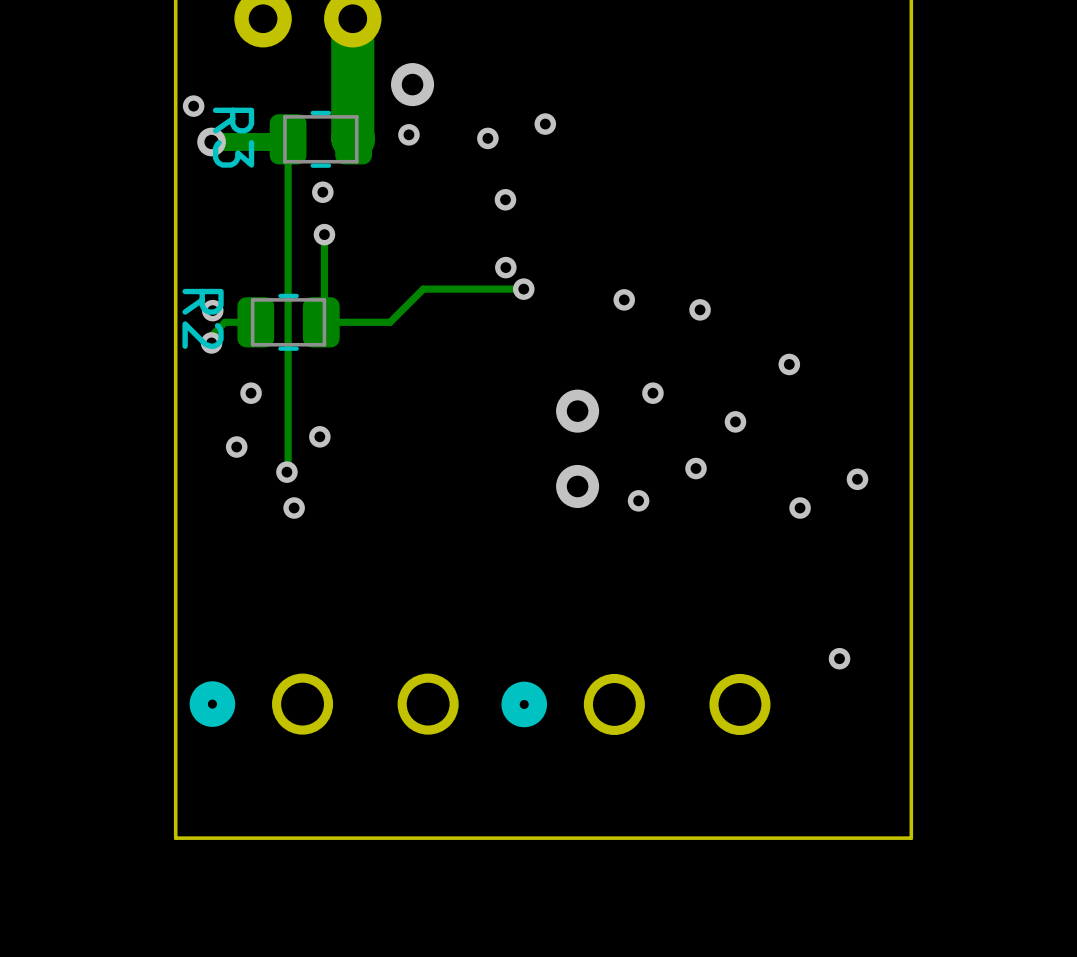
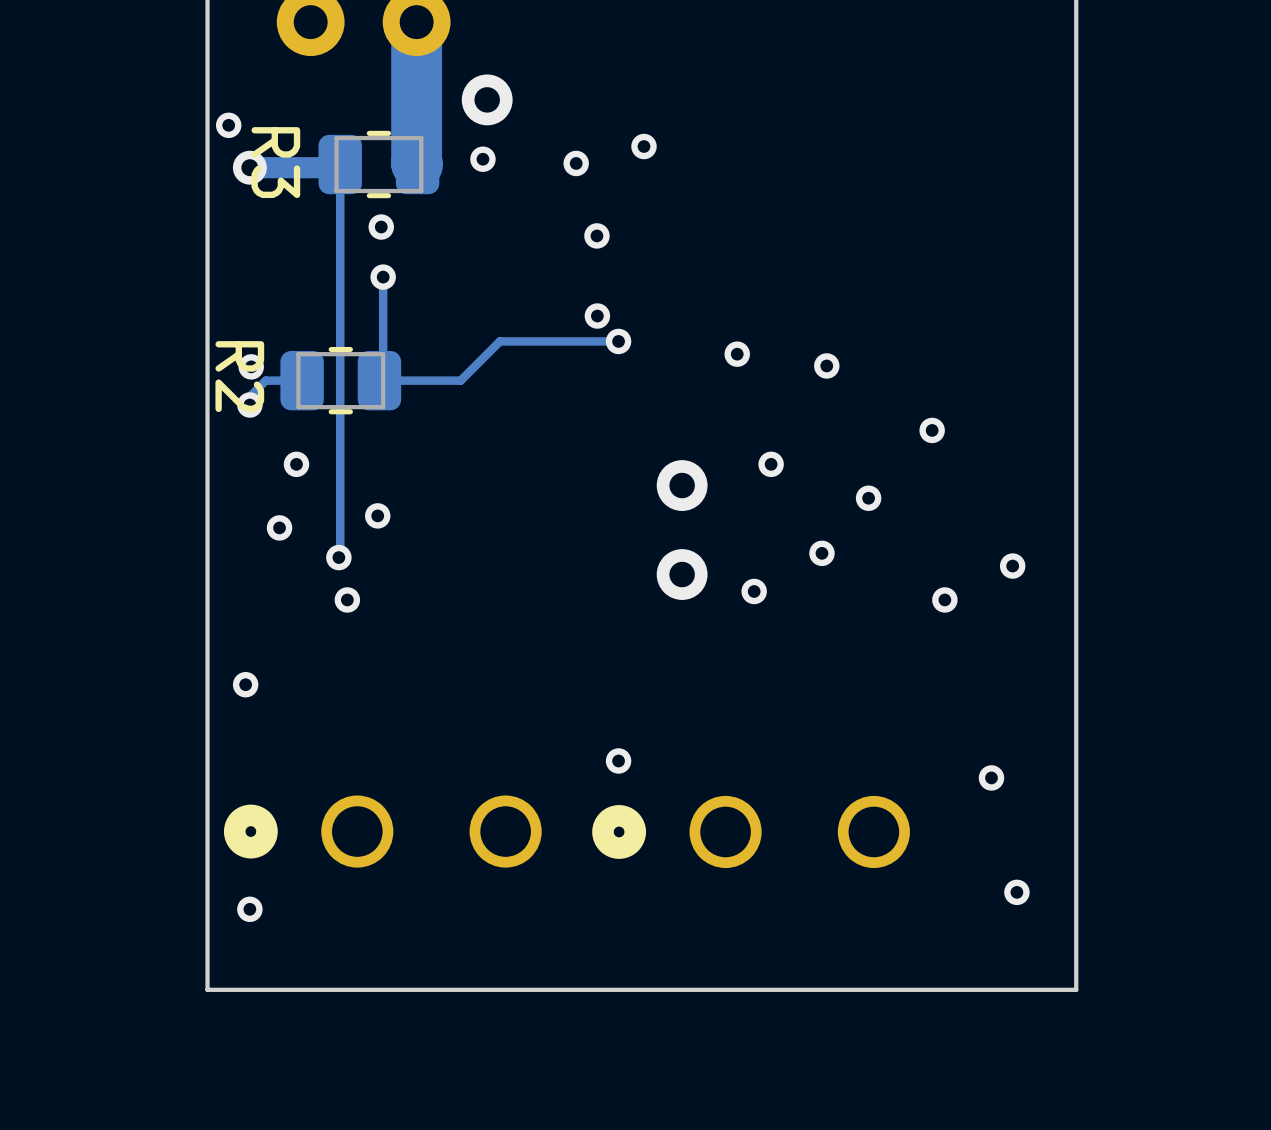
via: none -> (245, 684)
via: none -> (618, 760)
via: none -> (1016, 892)
via: none -> (249, 909)

